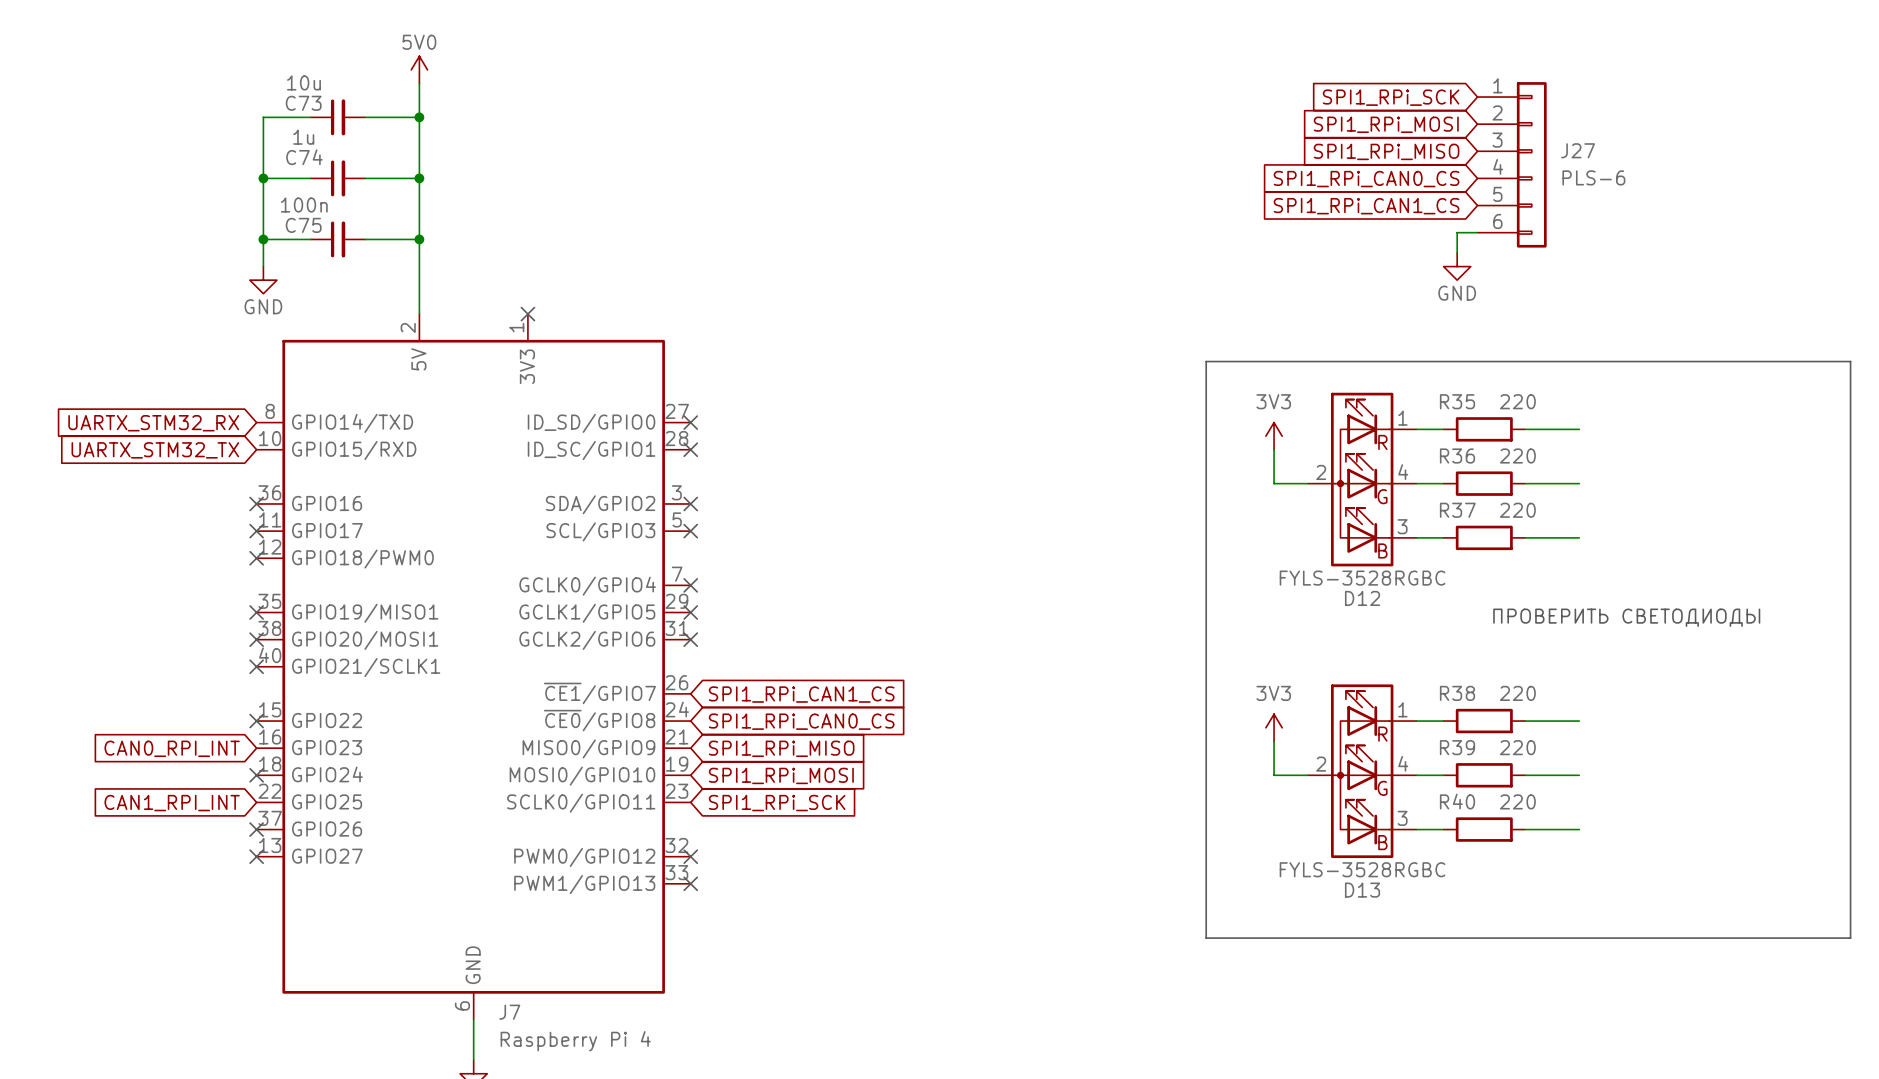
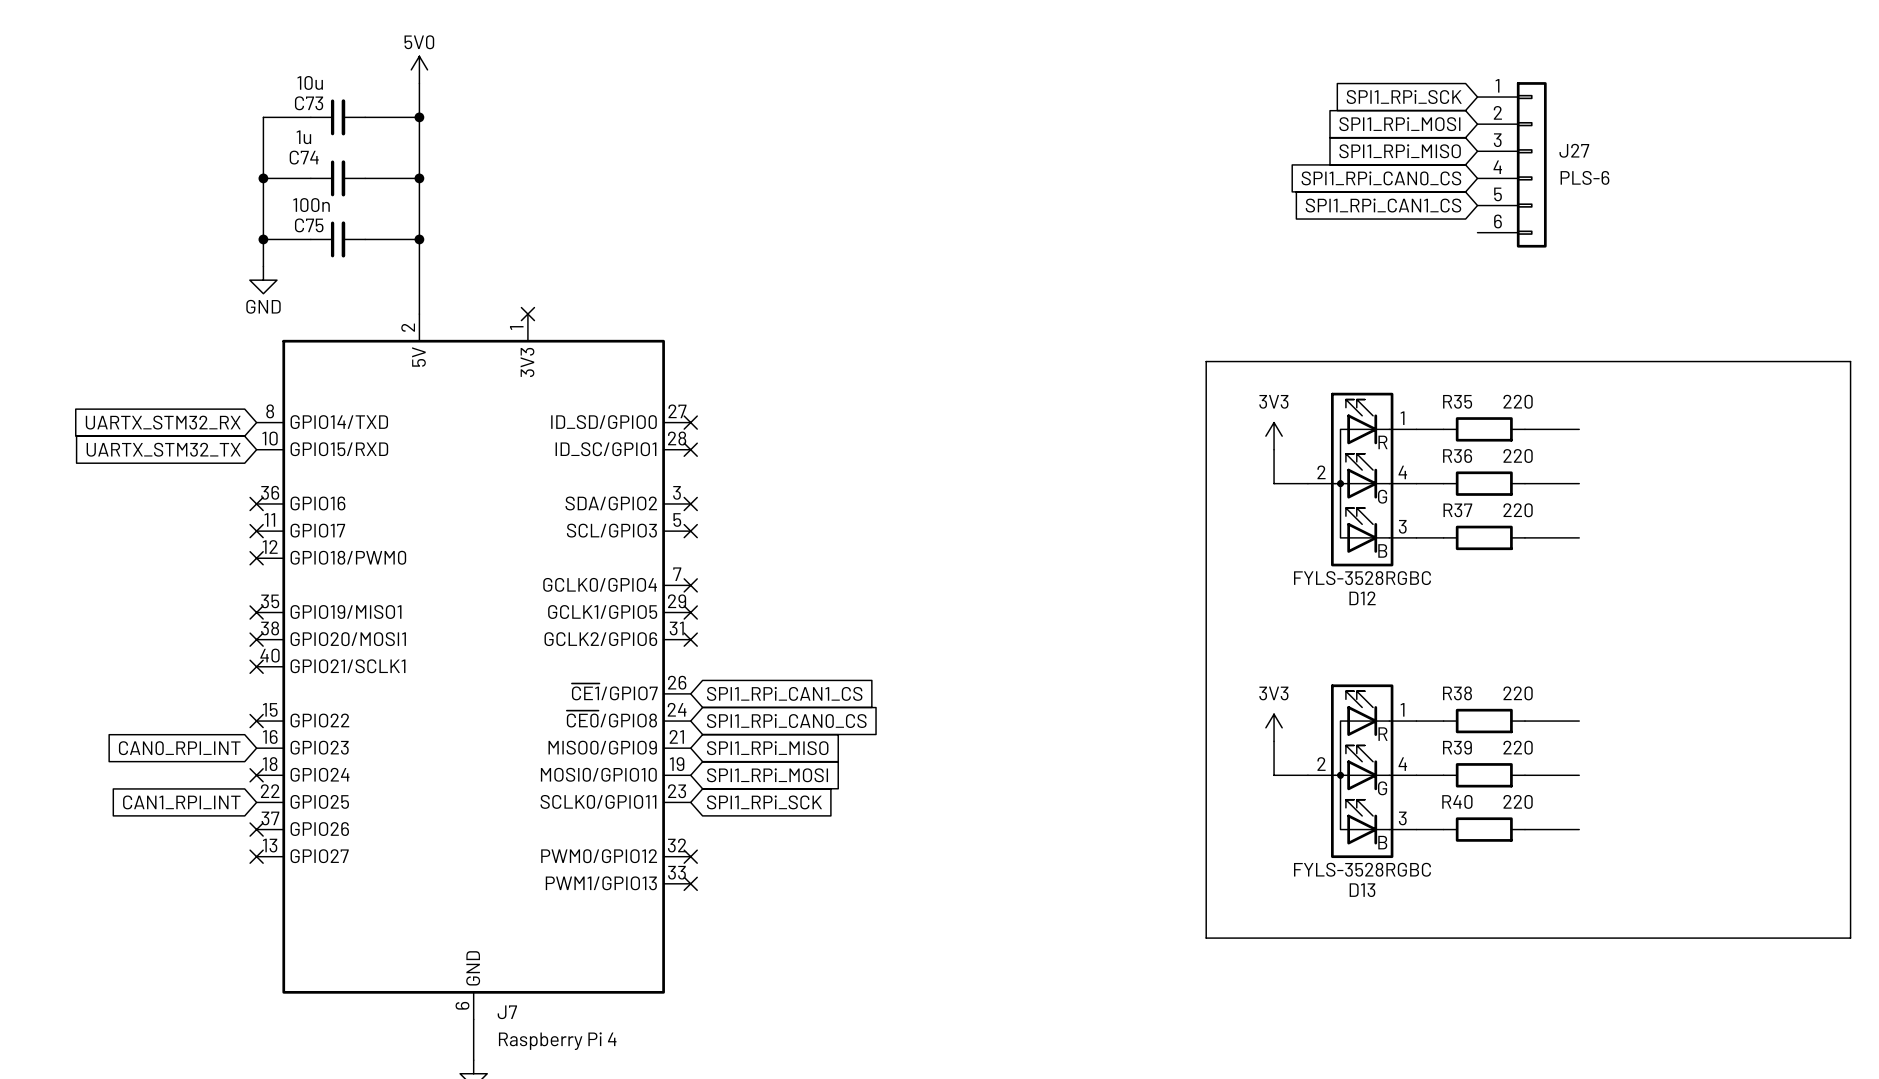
wire: (1477, 232) (1457, 232) (1457, 253) -> none
power symbol: GND (1457, 266) -> none
text: ПРОВЕРИТЬ СВЕТОДИОДЫ (1626, 617) -> none

